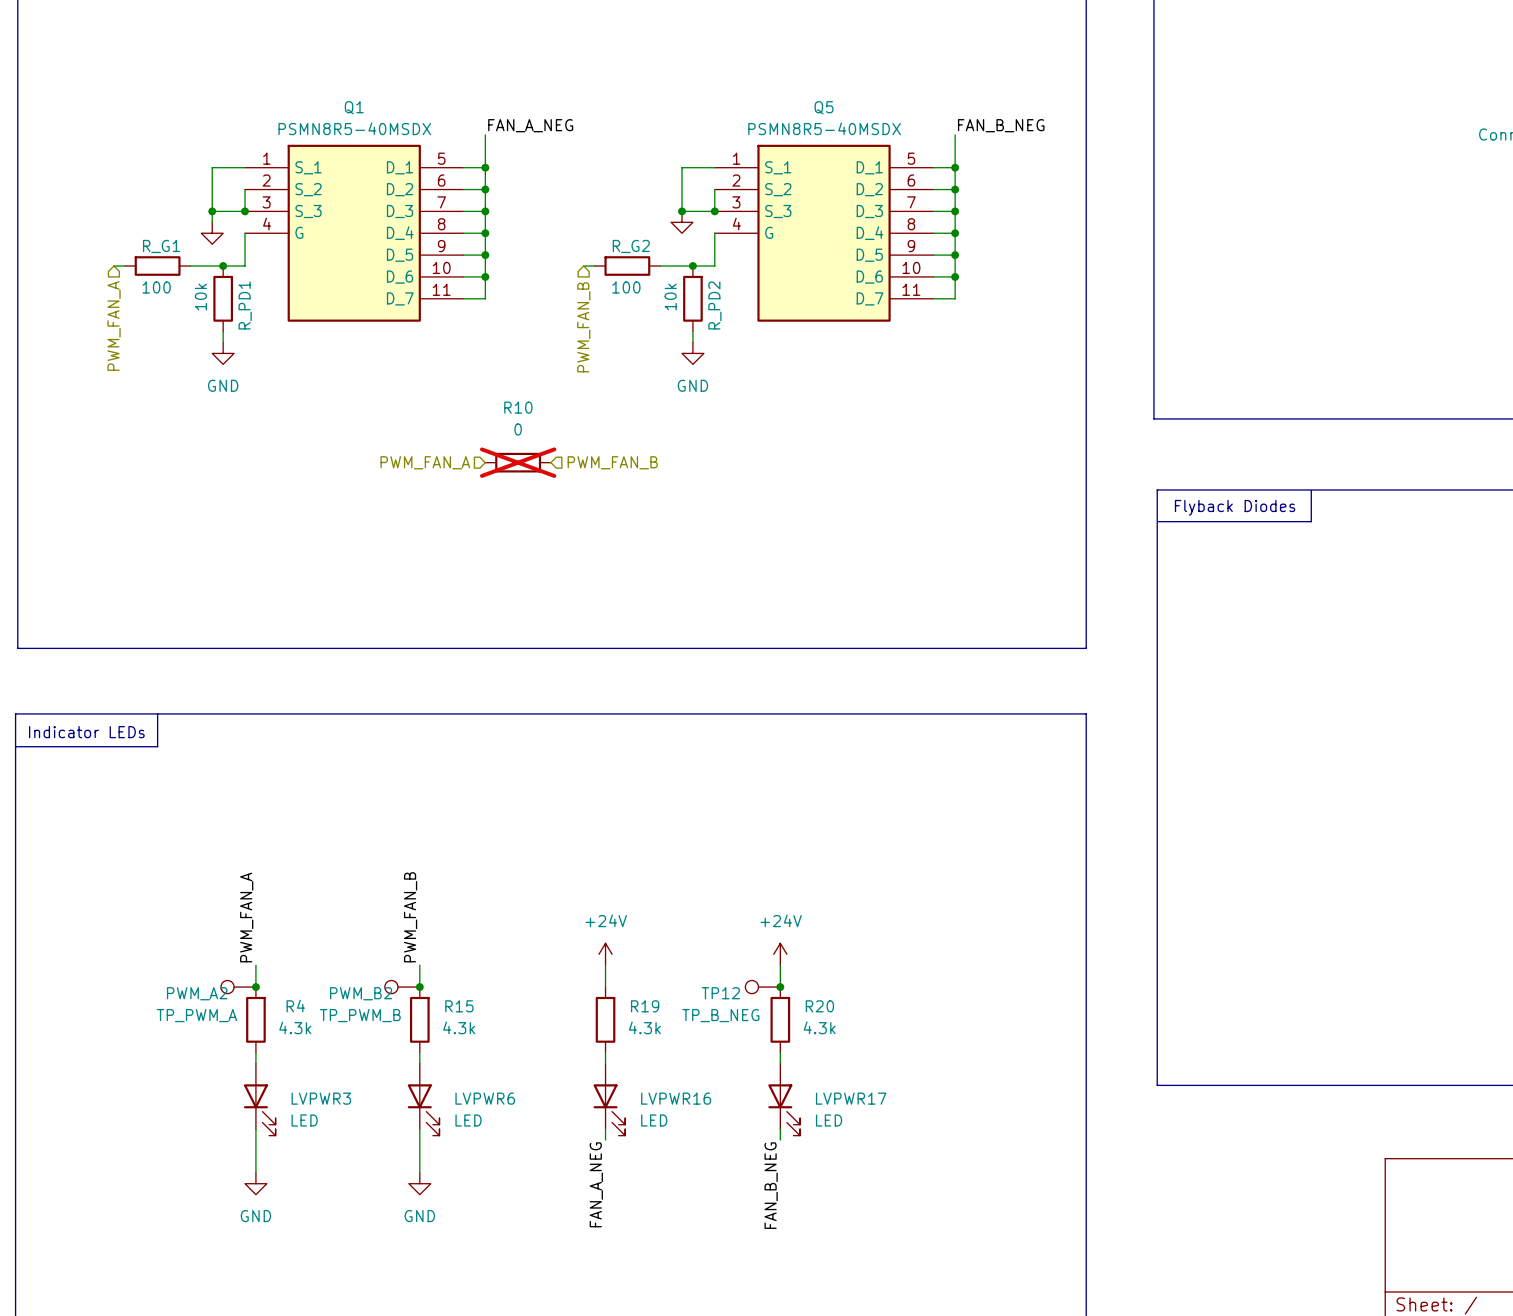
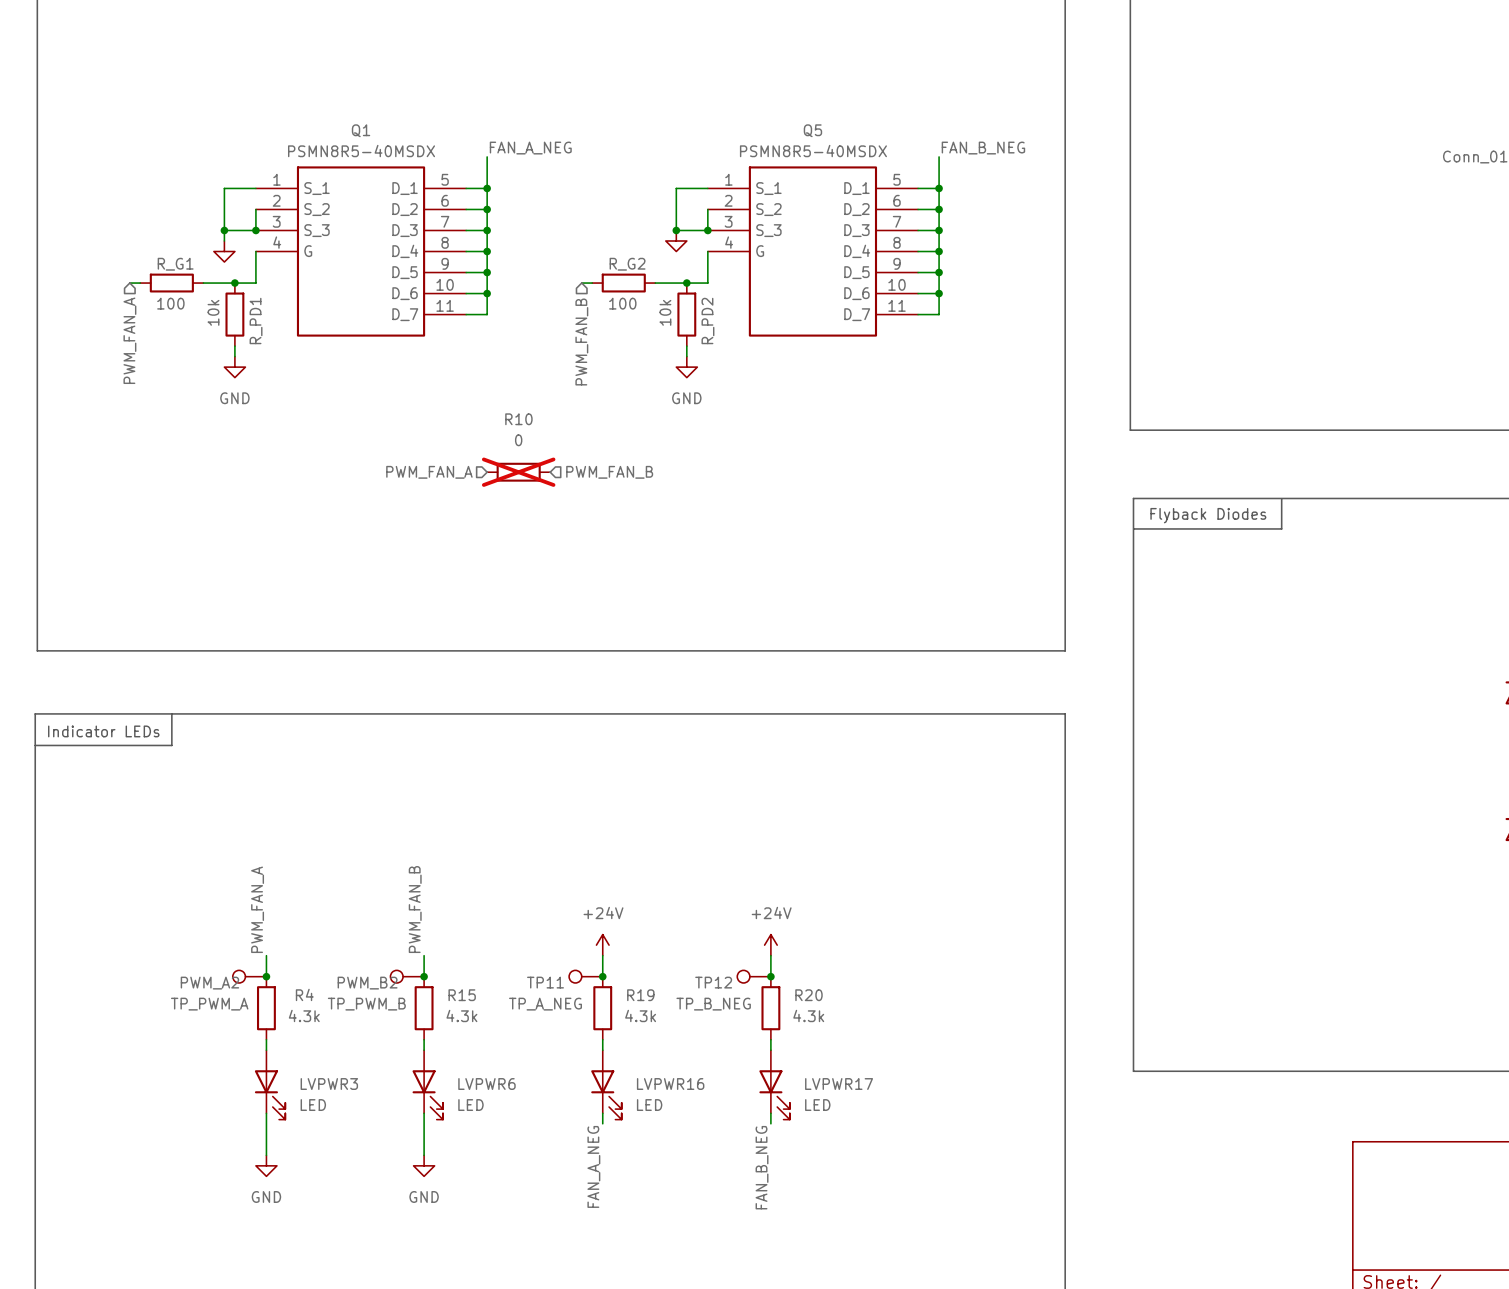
TP11: none -> TP_A_NEG (585, 976)
junction: none -> (602, 976)

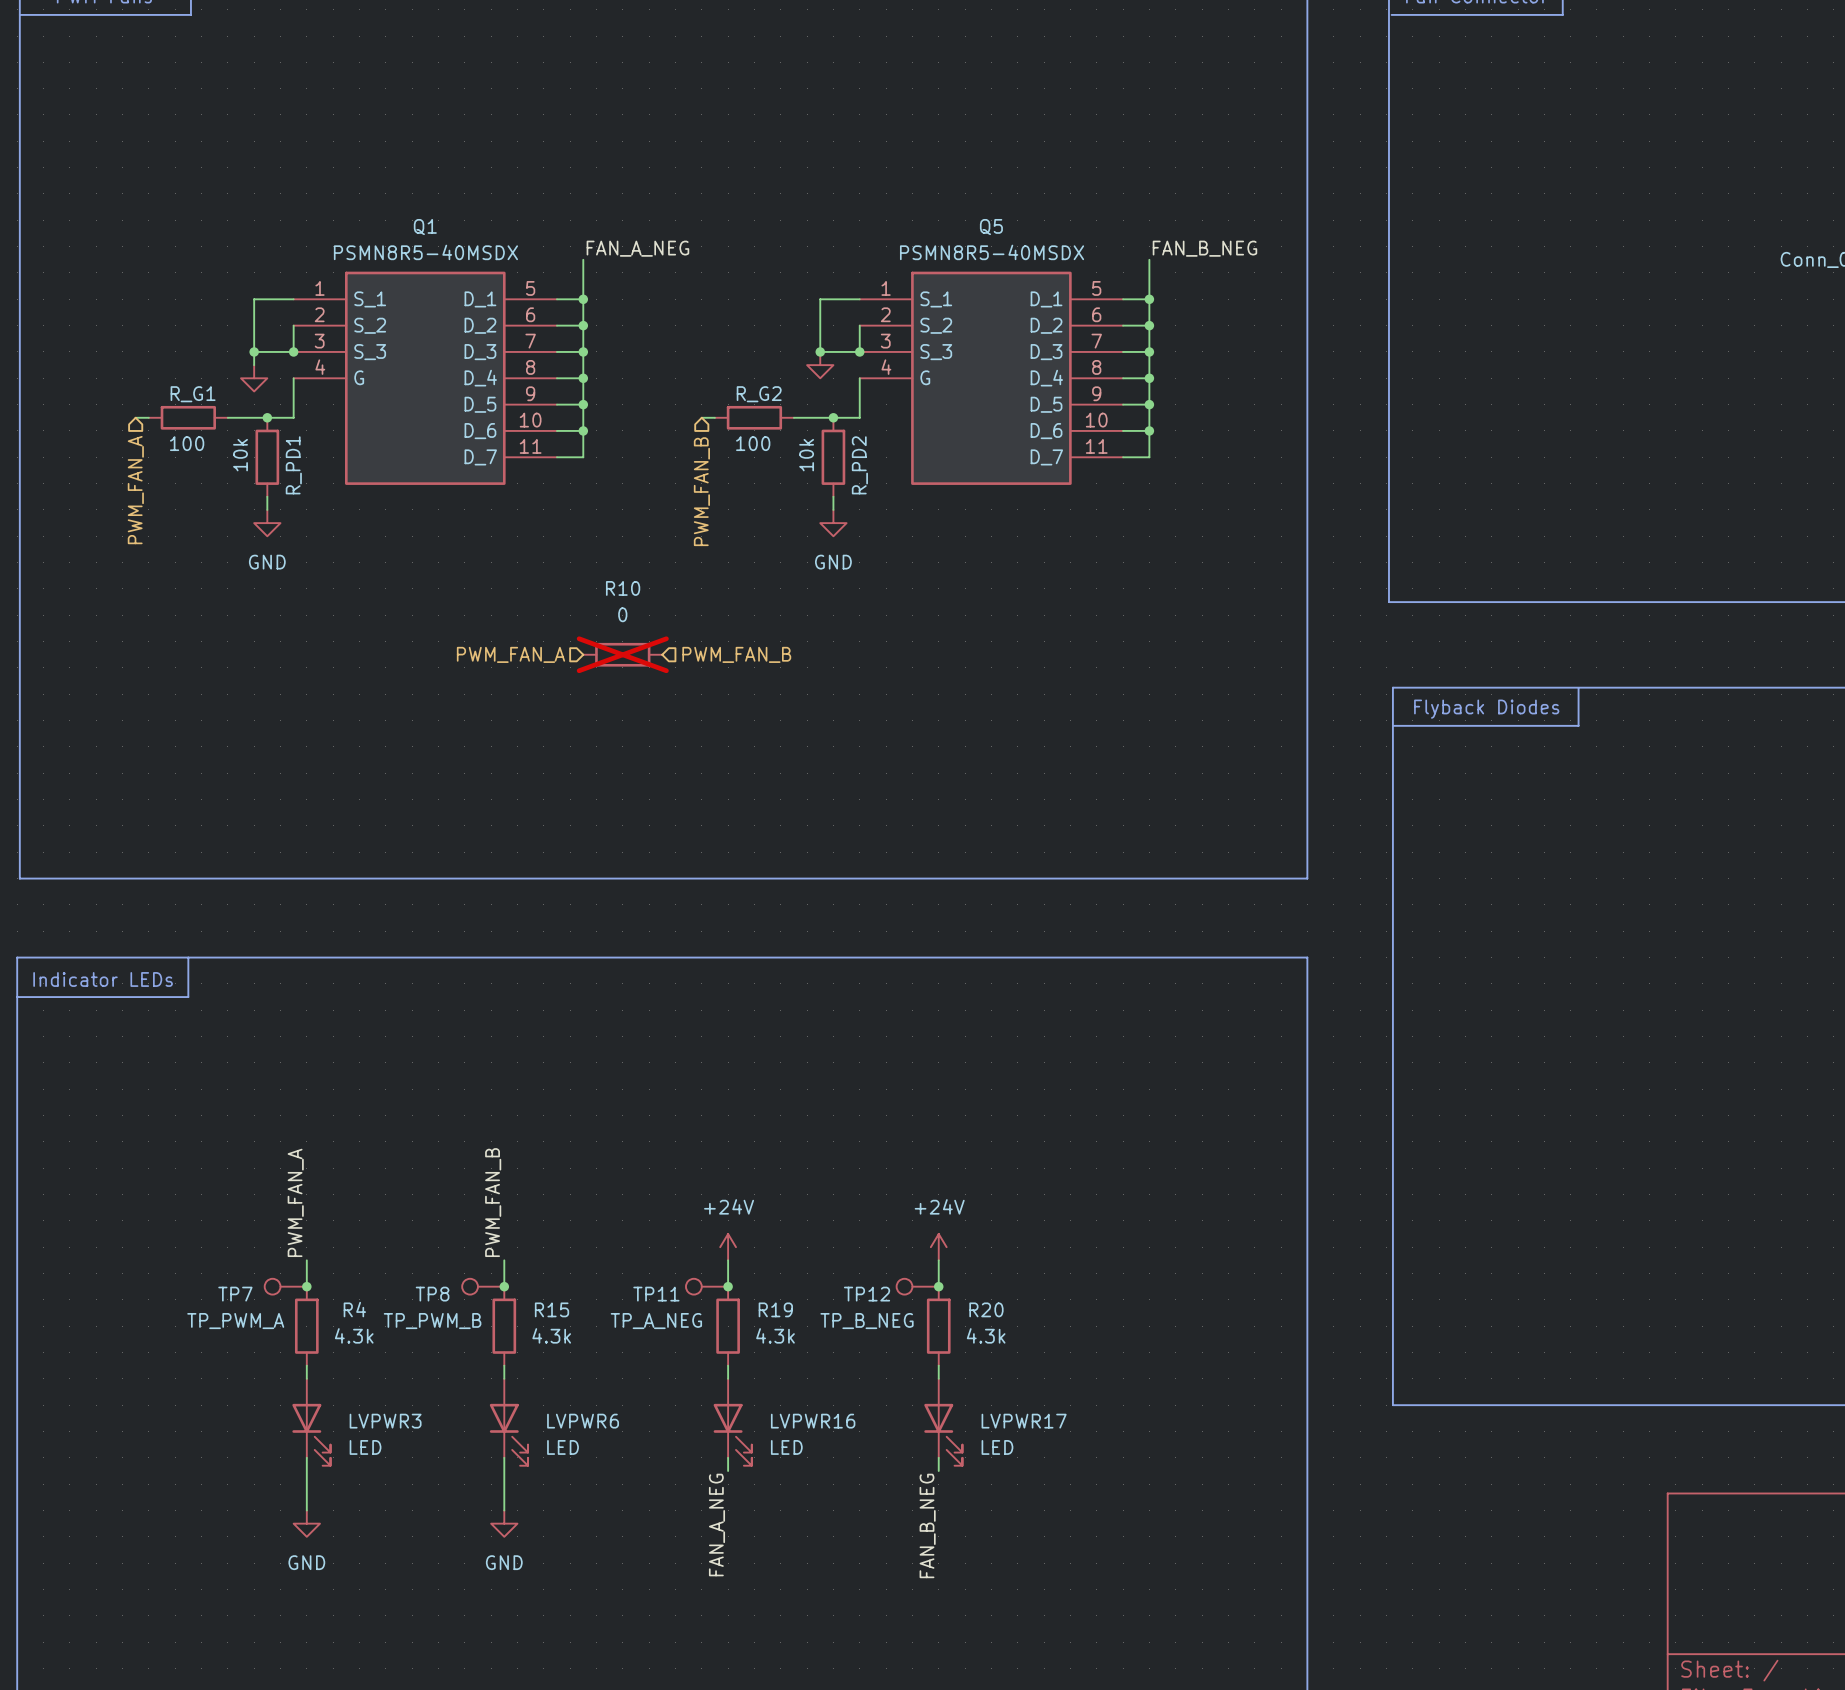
PWM_A2 name: PWM_A2 (209, 983) -> TP7 (235, 1294)
PWM_B2 name: PWM_B2 (367, 983) -> TP8 (432, 1294)

